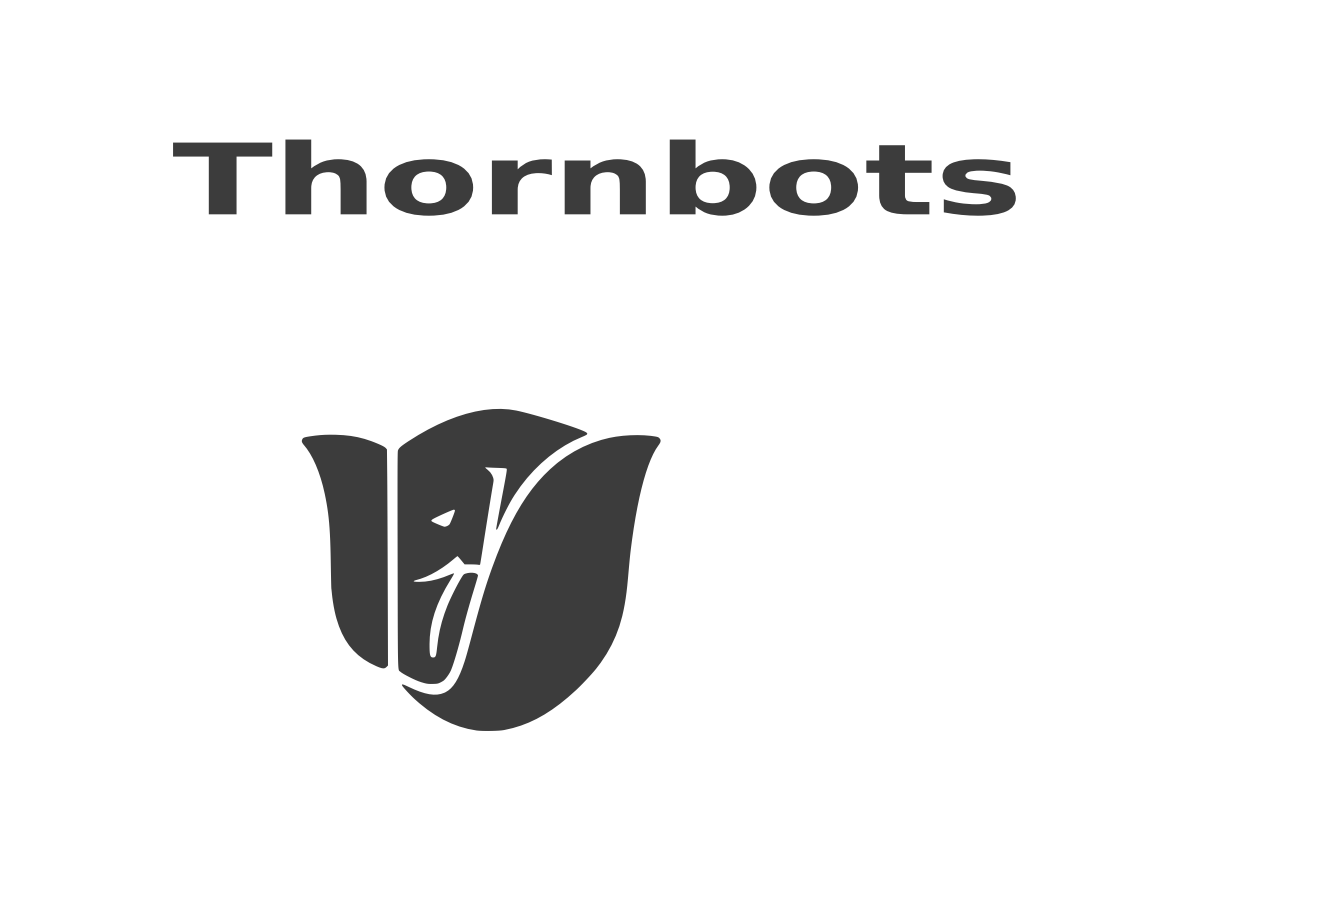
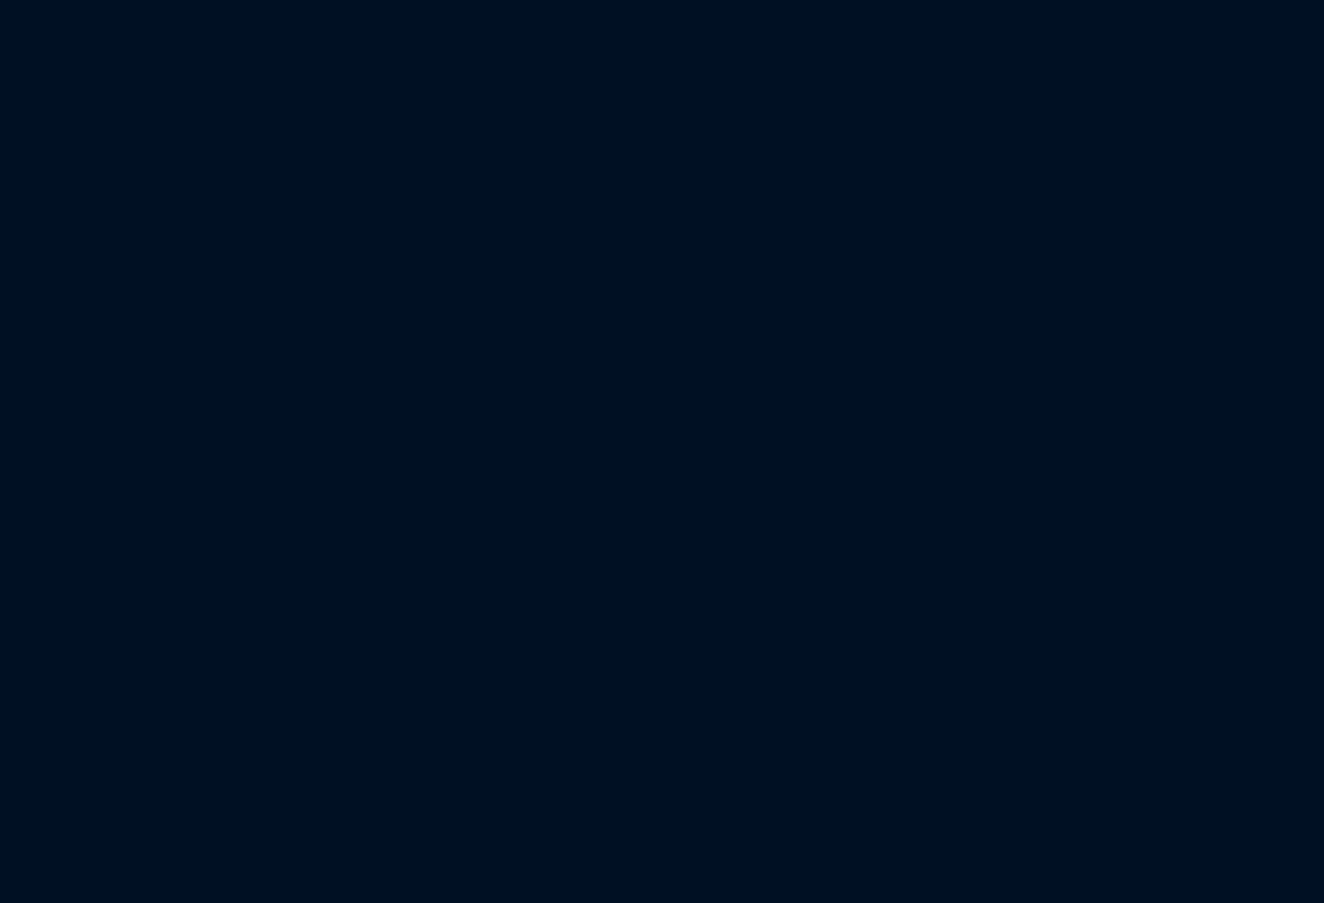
text: Thornbots (594, 177) -> none
drawing: [301, 408, 661, 731] -> none

